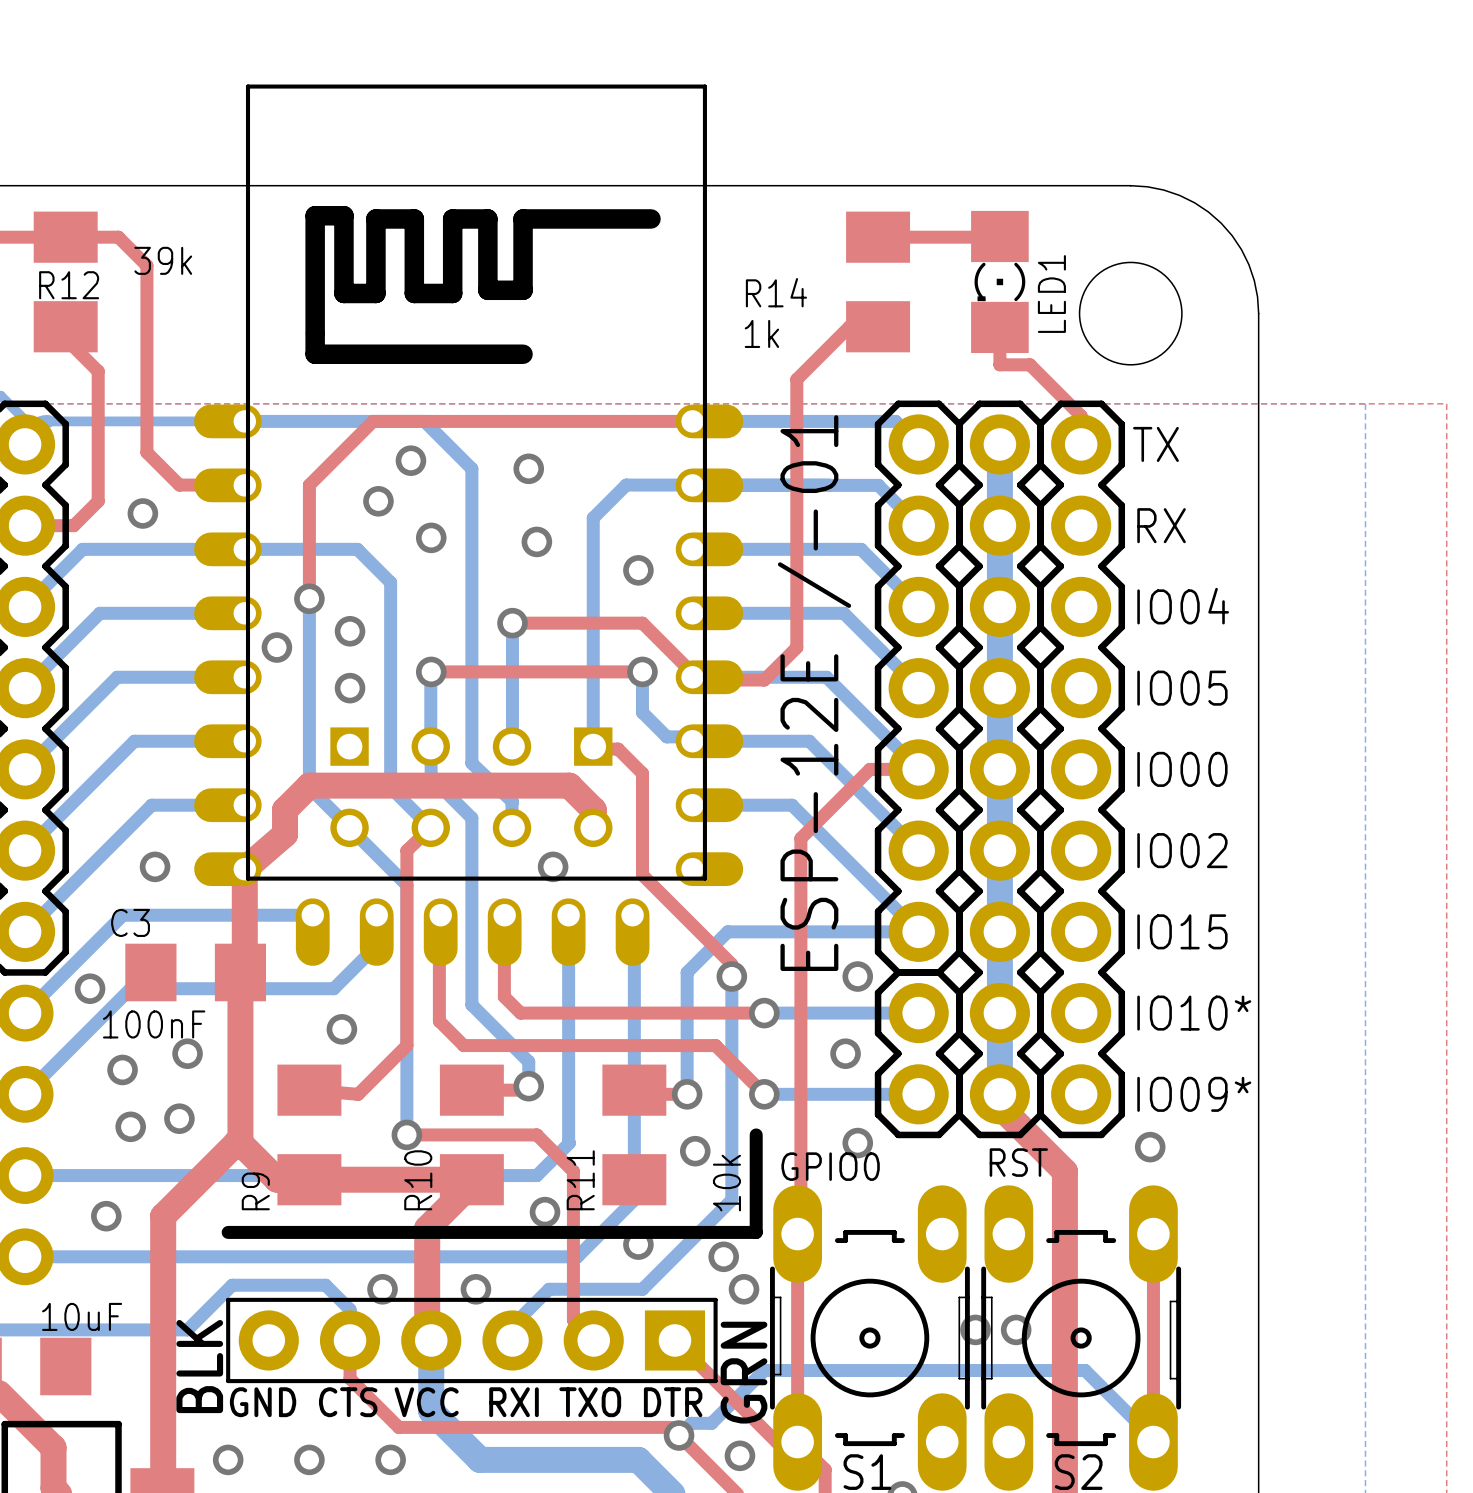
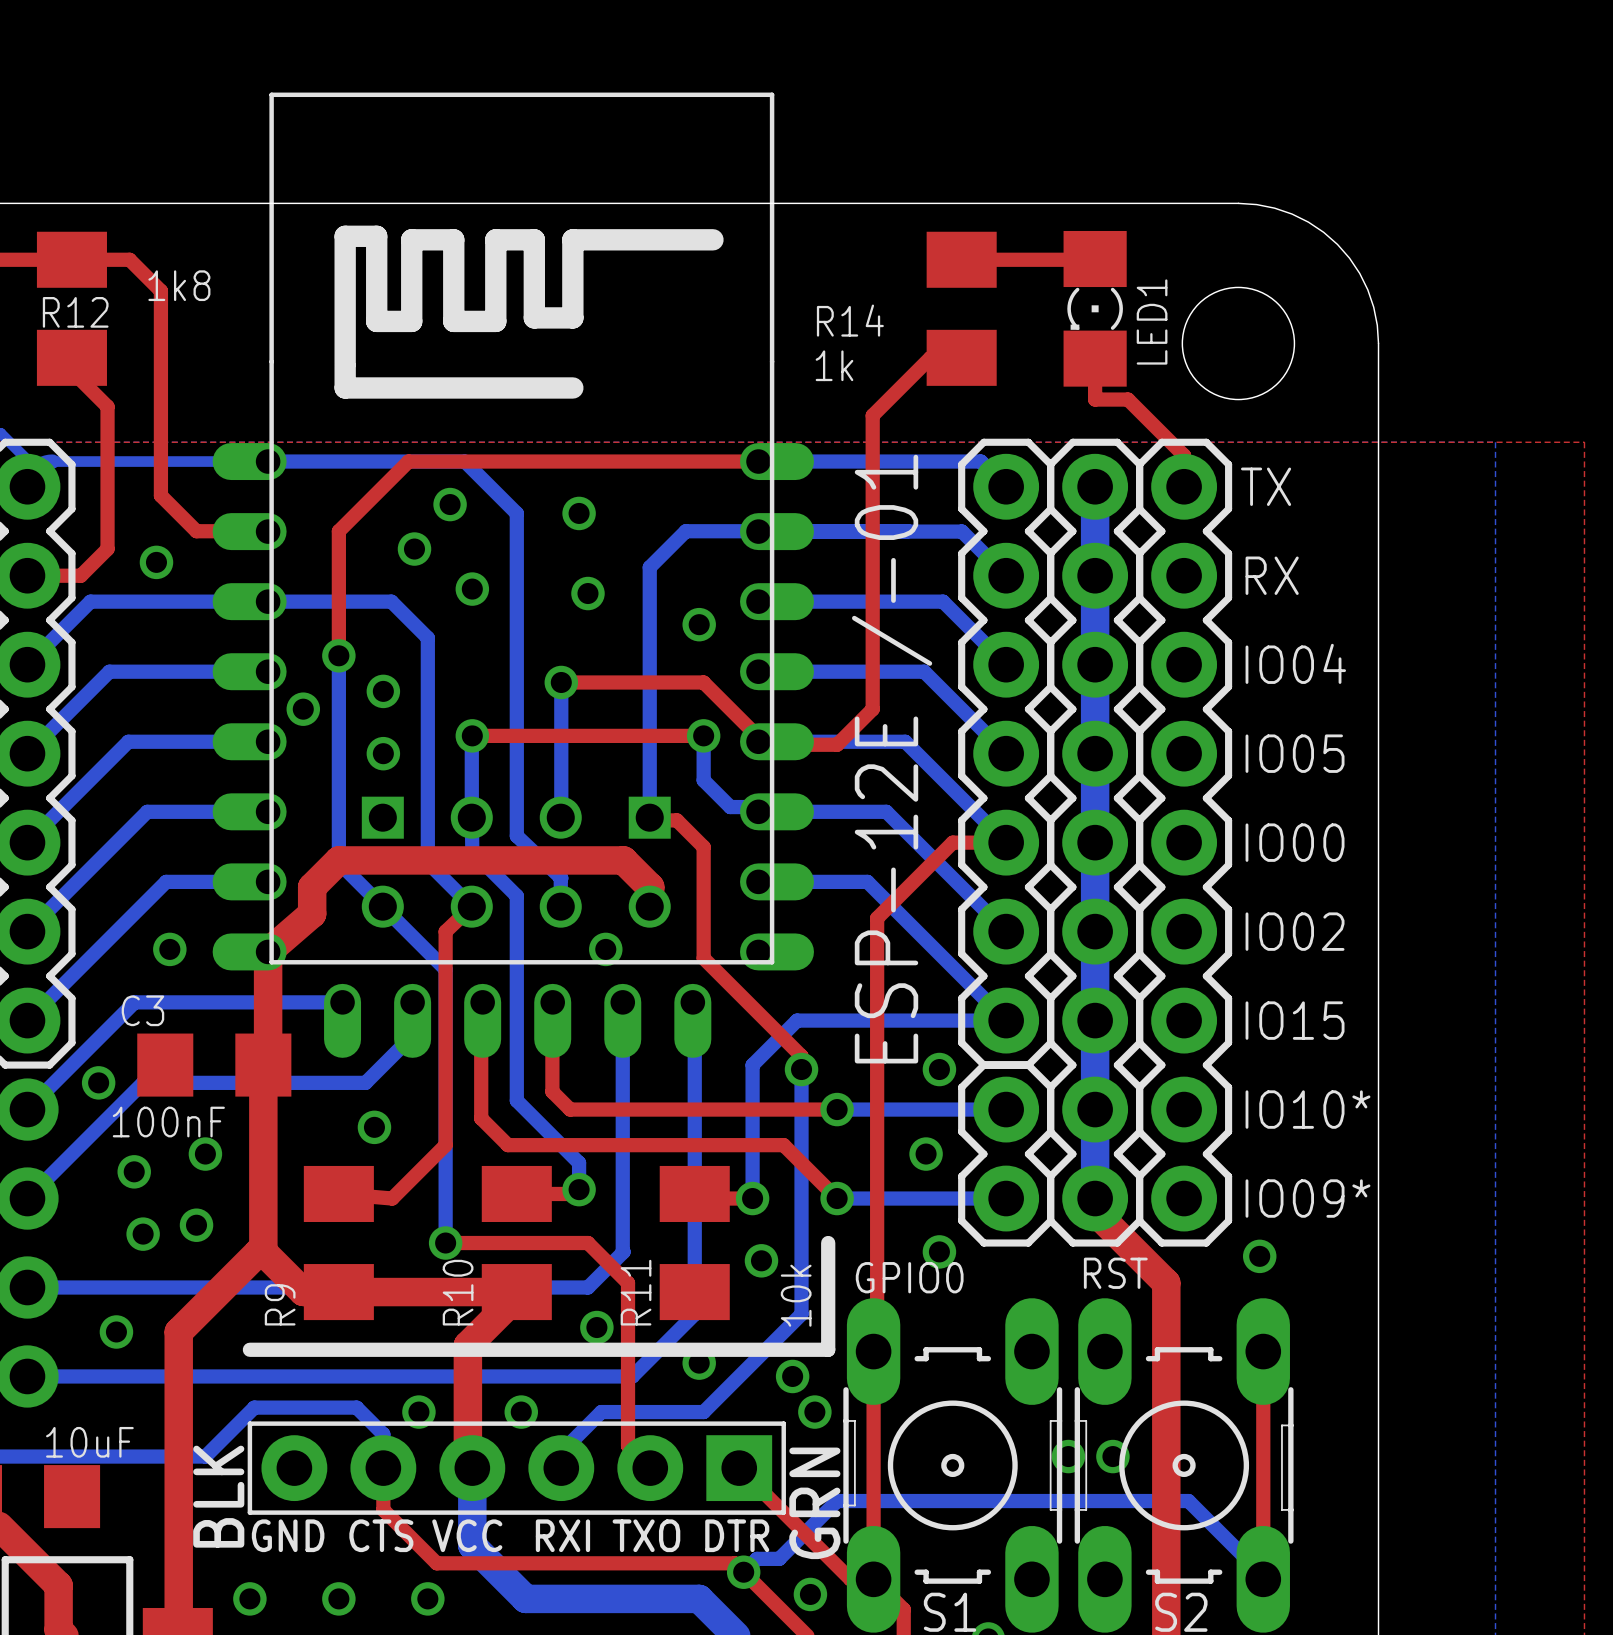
R12 value: 39k (163, 260) -> 1k8 (179, 285)

